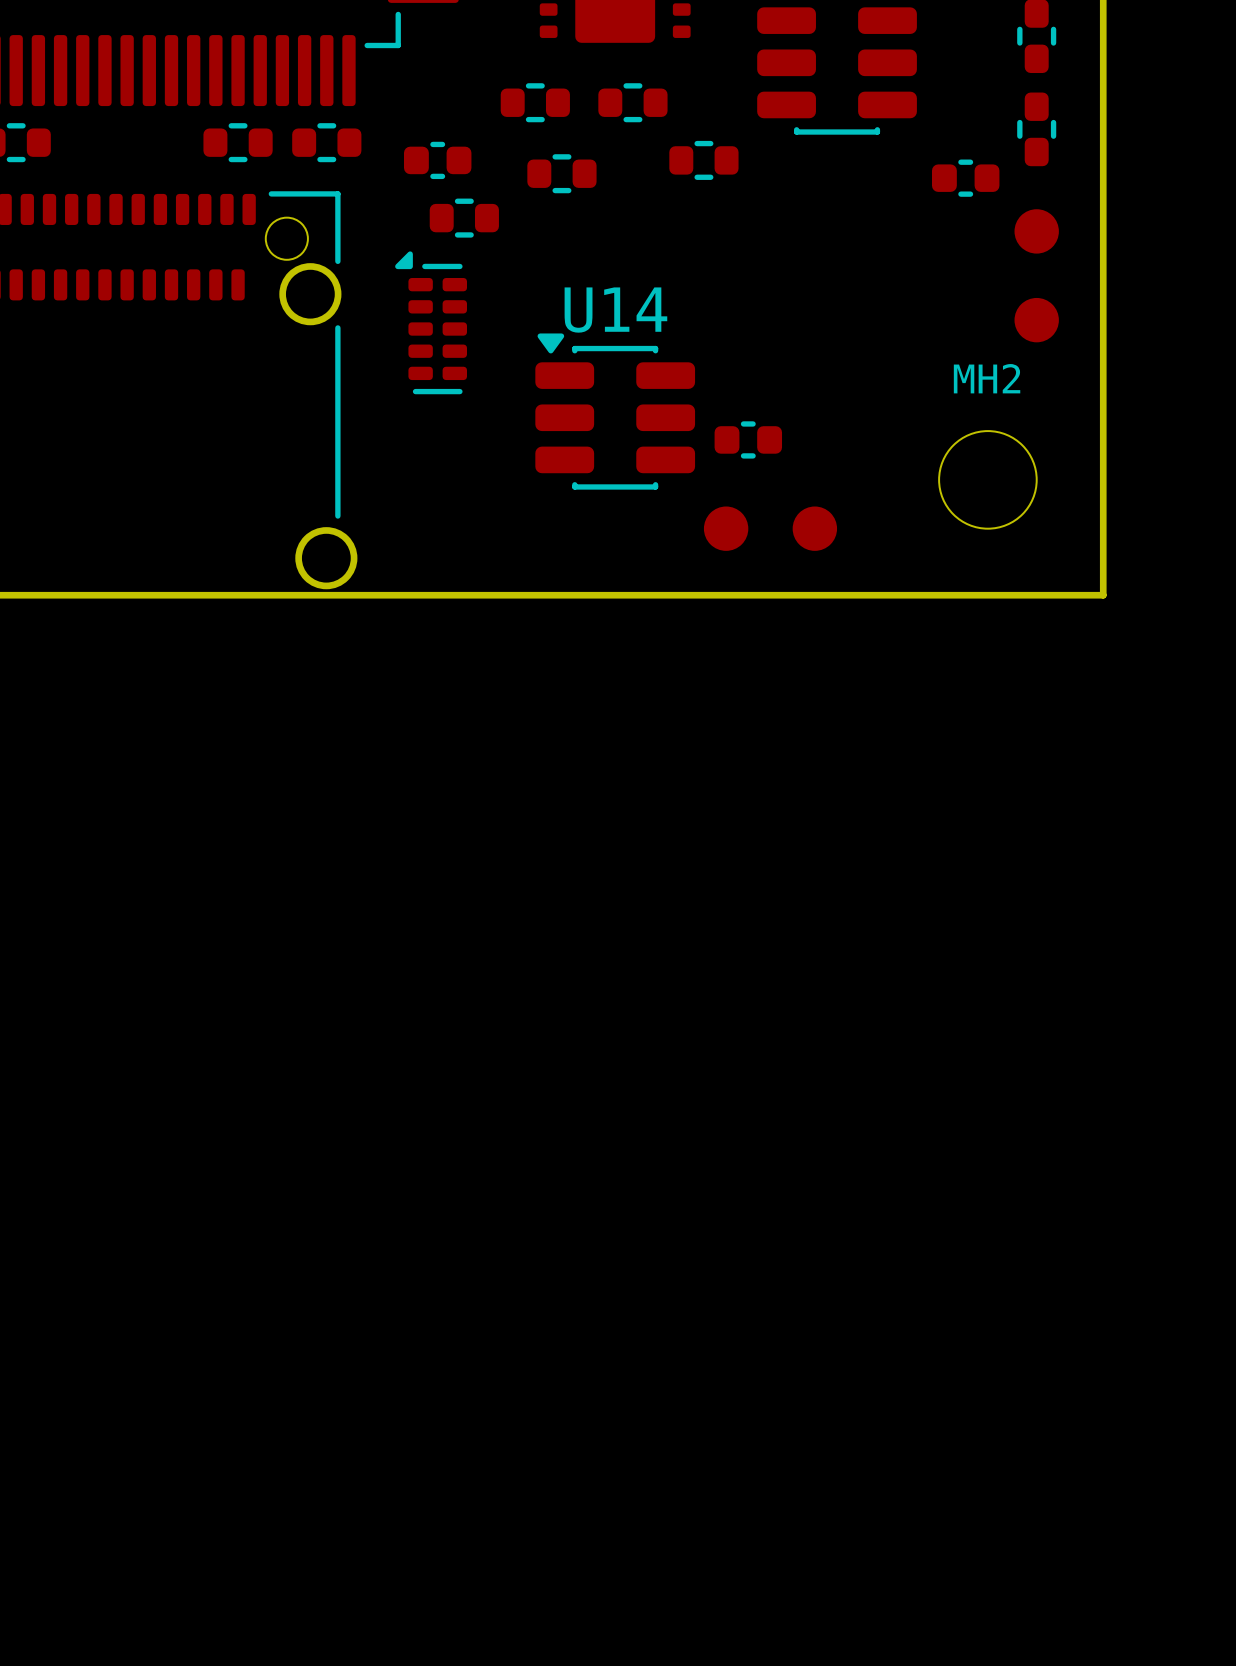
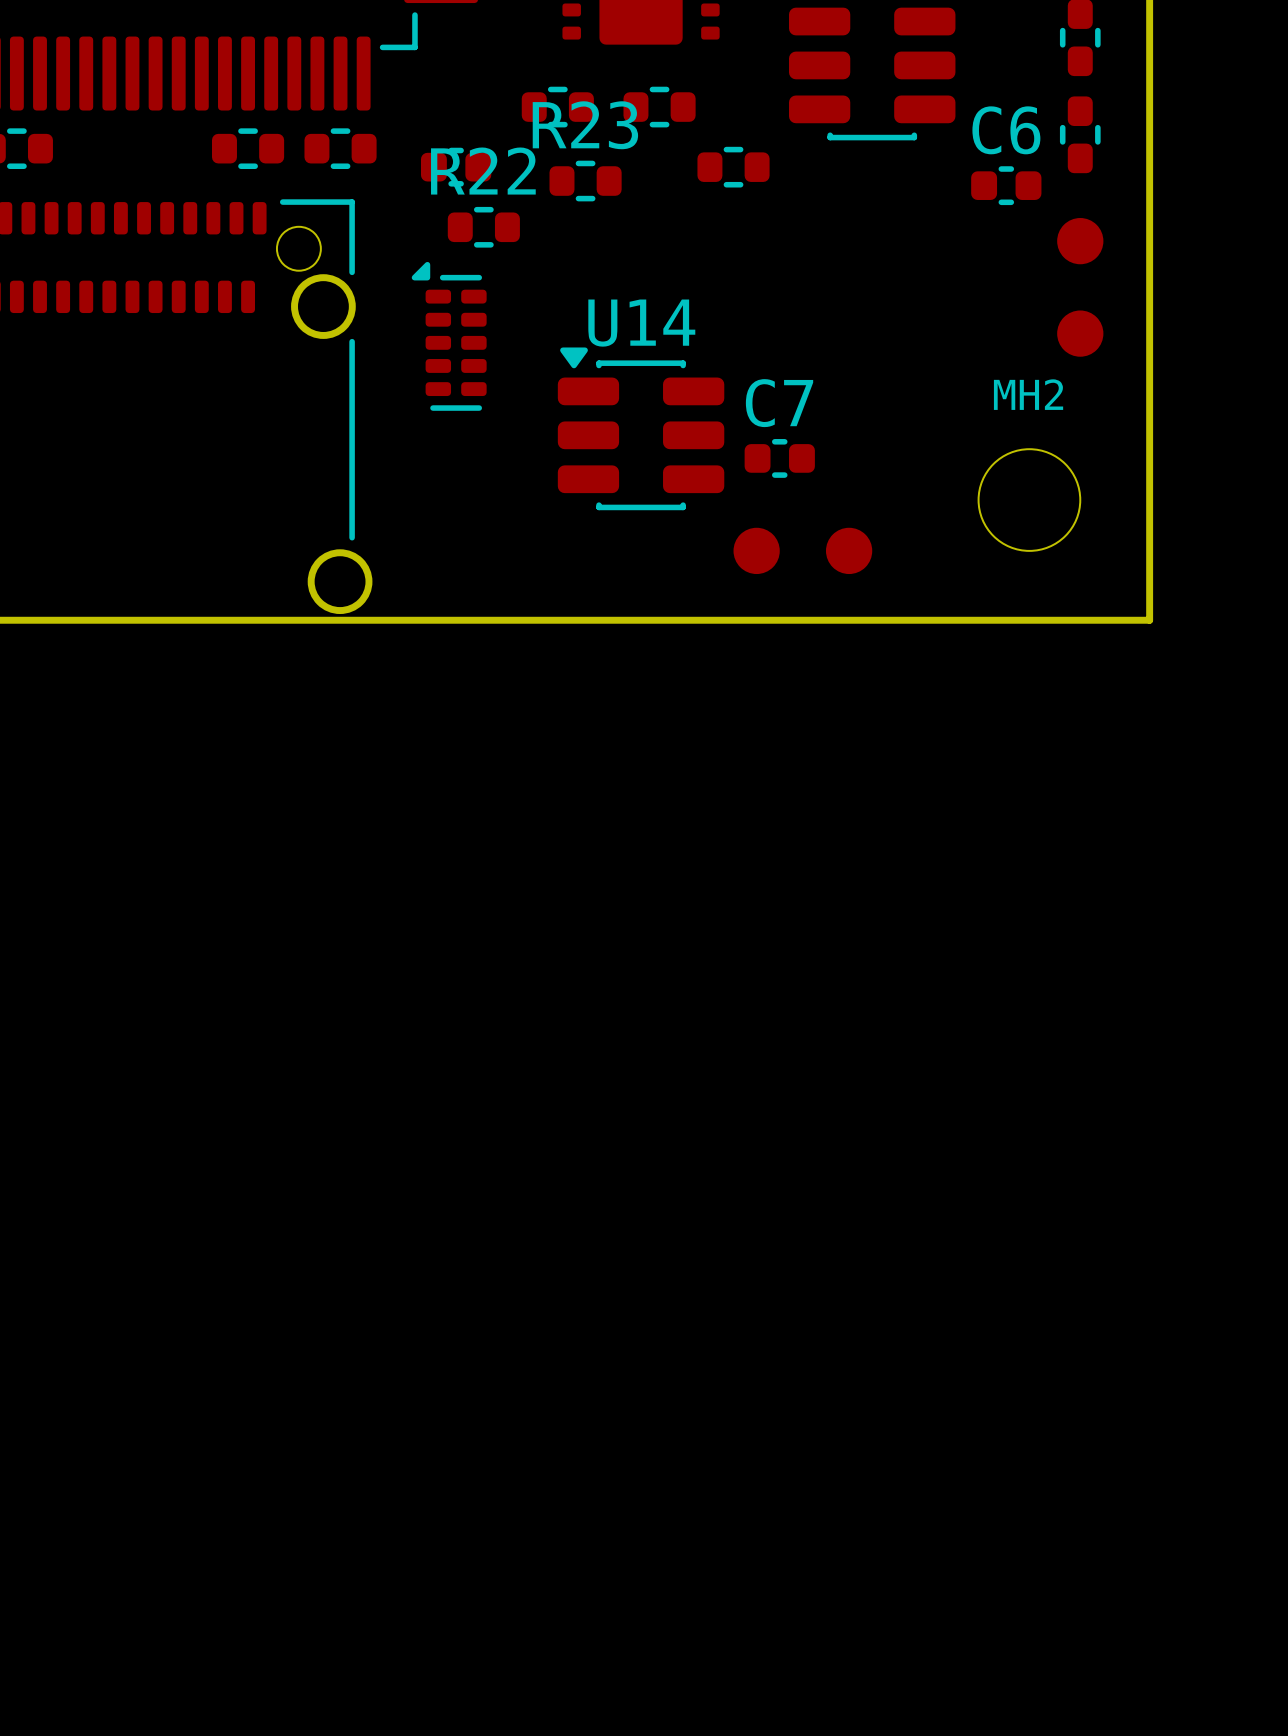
R23 name: none -> R23 (585, 125)
C6 name: none -> C6 (1006, 130)
R22 name: none -> R22 (483, 171)
C7 name: none -> C7 (779, 403)

